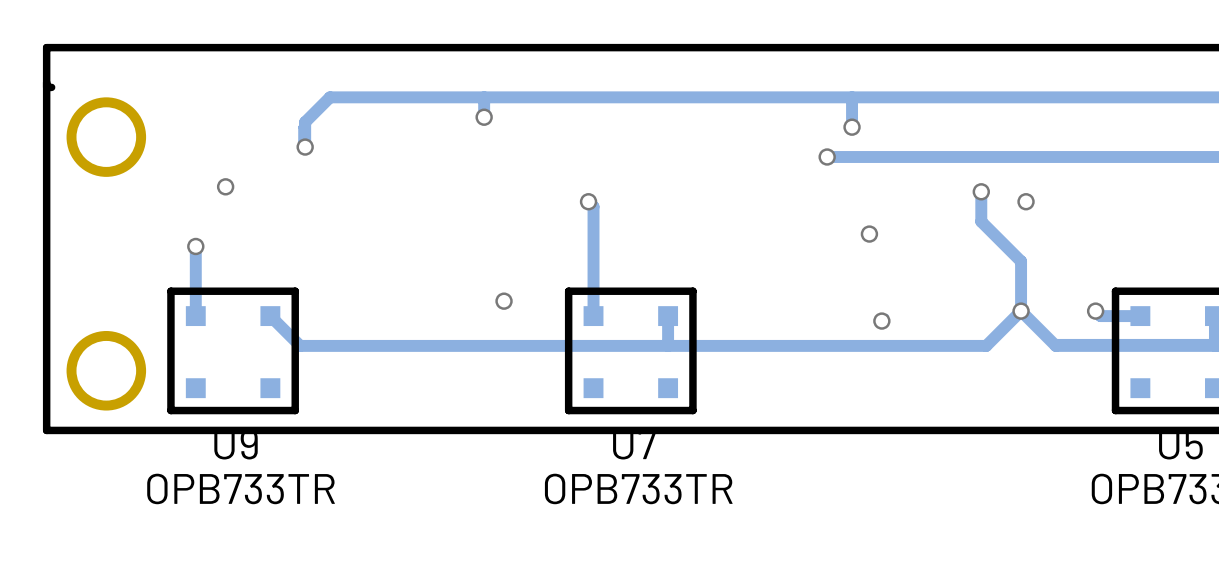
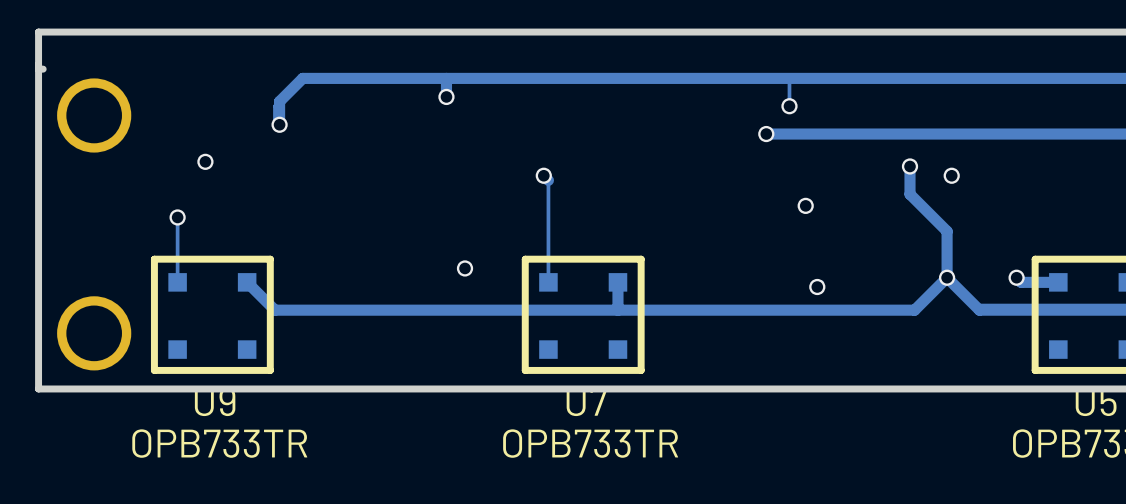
track width: thick (852, 97) (852, 127) -> thin (789, 78) (789, 106)
track width: thick (593, 206) (593, 316) -> thin (548, 180) (548, 282)
track width: thick (195, 246) (195, 316) -> thin (177, 217) (177, 282)

